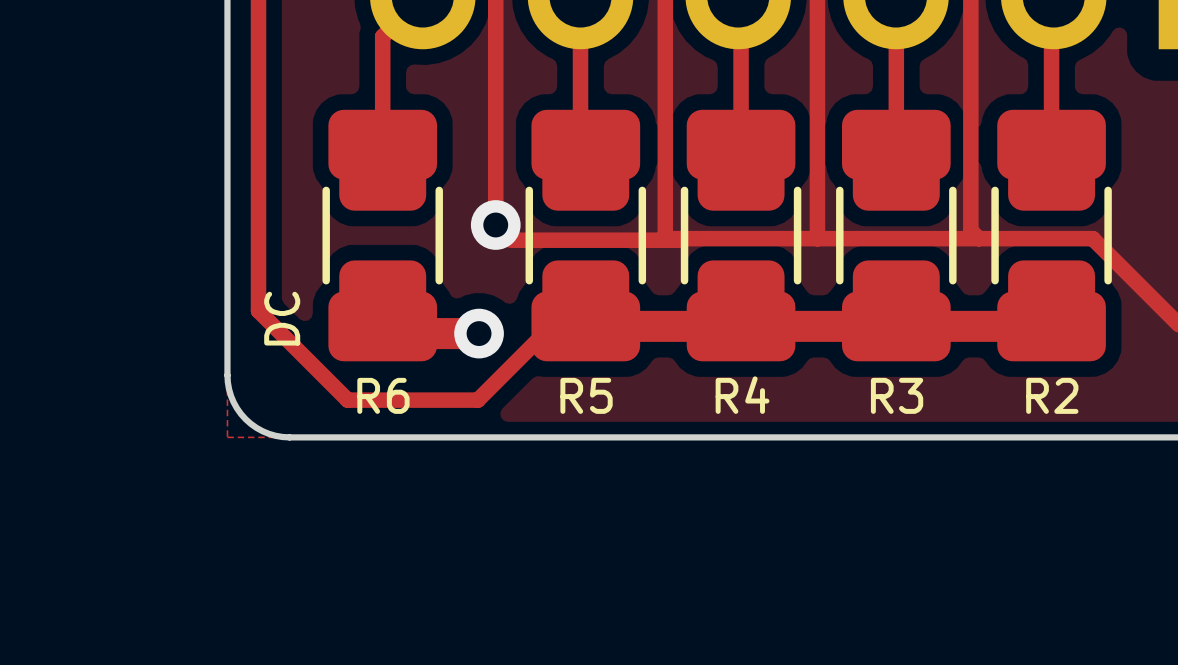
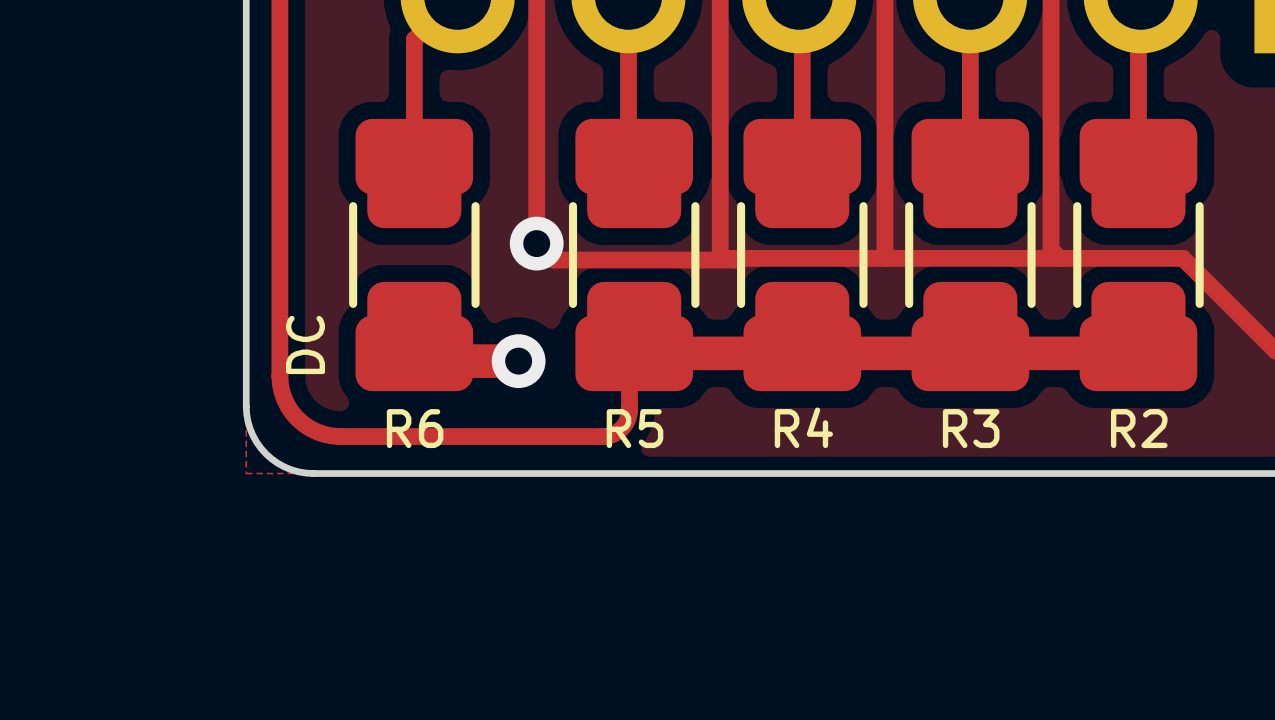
track: (585, 292) (477, 400) (347, 400) (258, 310) -> (634, 353) (629, 357) (627, 418) (619, 430) (608, 435) (340, 436) (324, 434) (310, 428) (297, 418) (287, 406) (280, 383) (279, 336)

